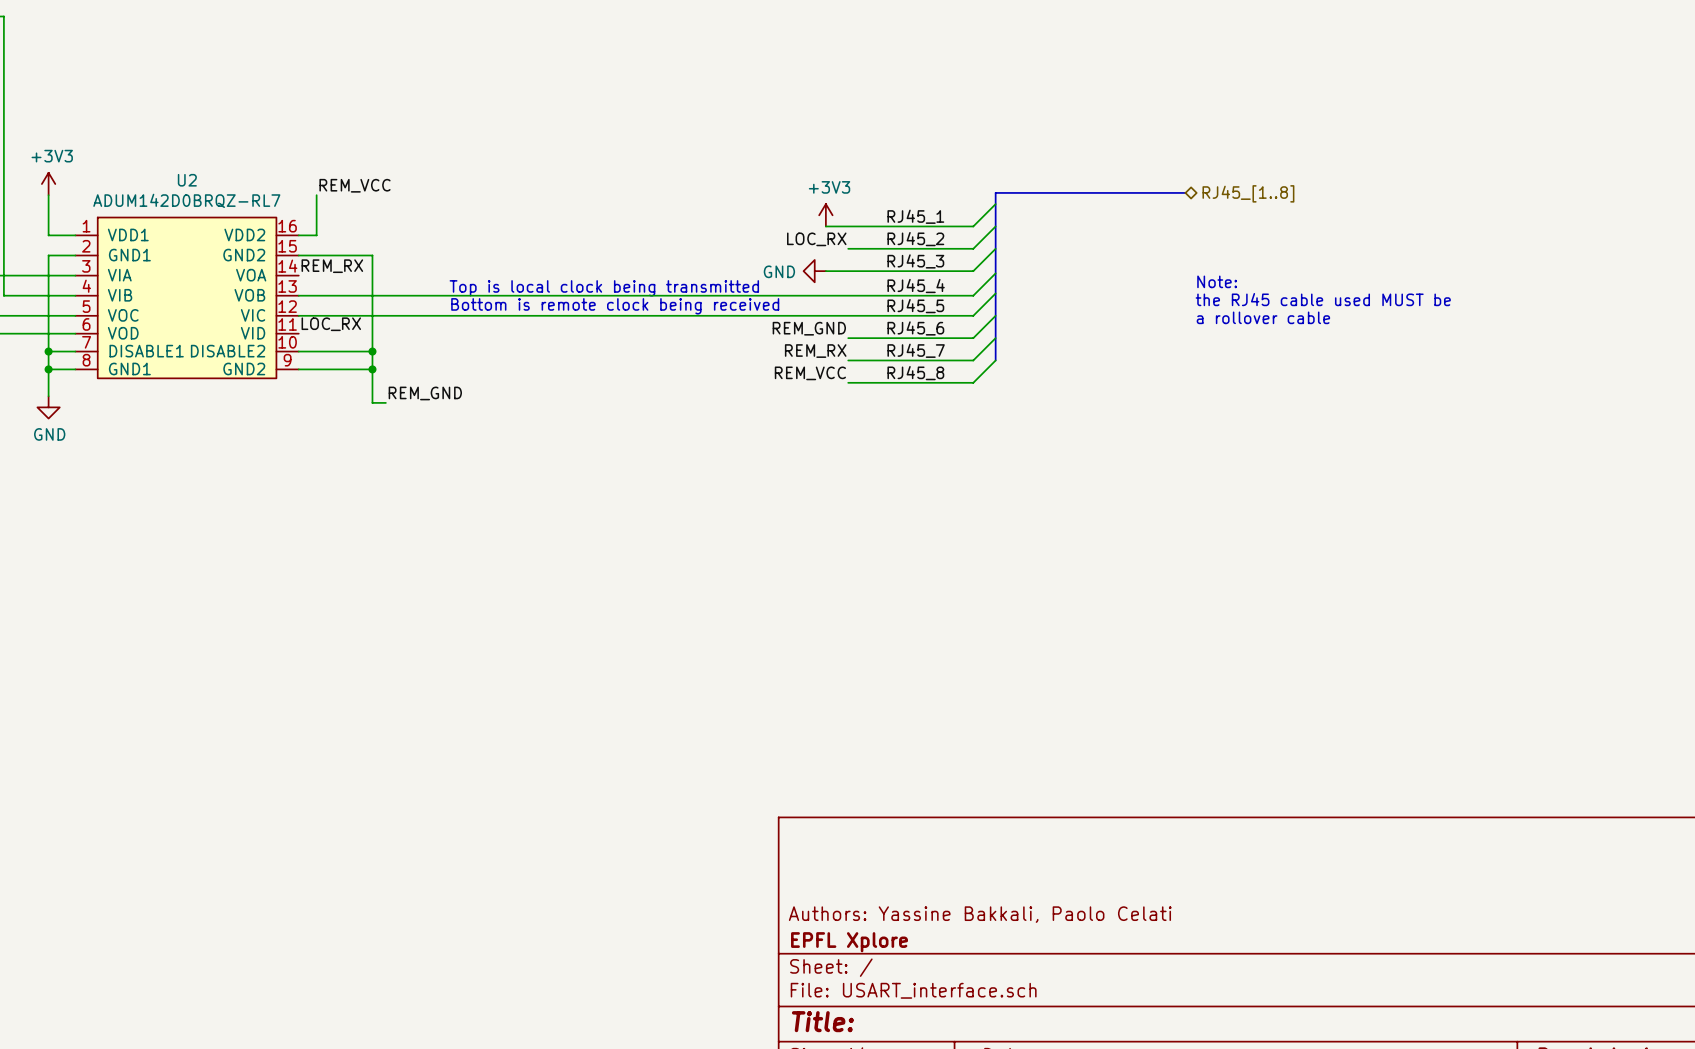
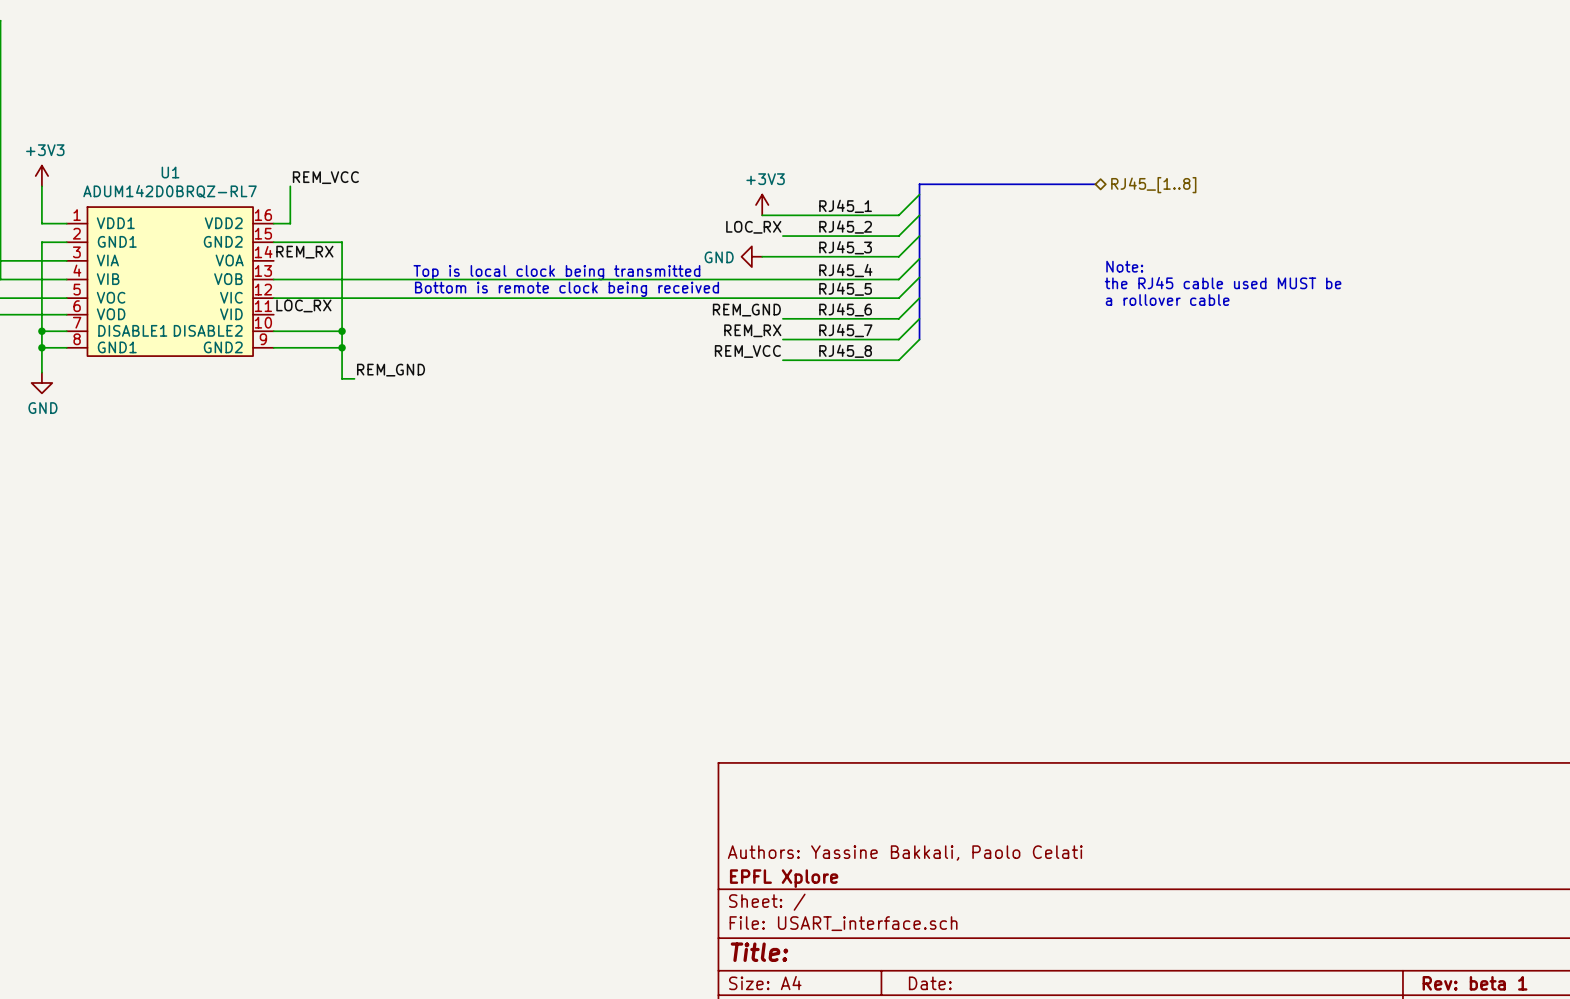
U2 name: U2 (187, 180) -> U1 (170, 172)

